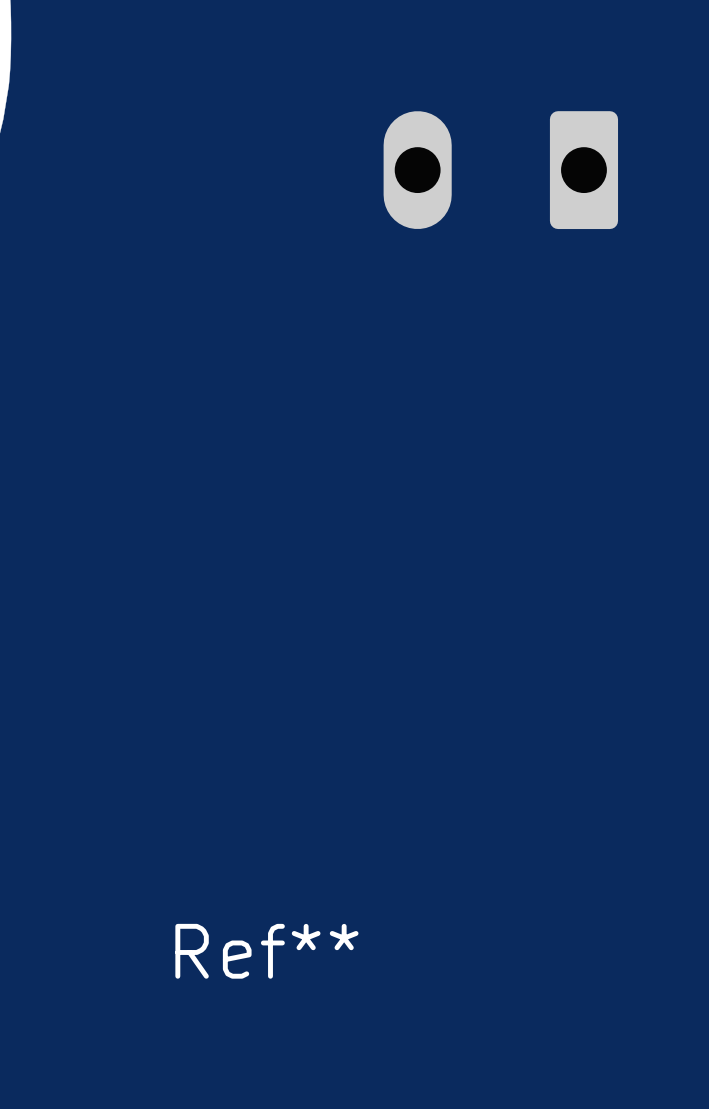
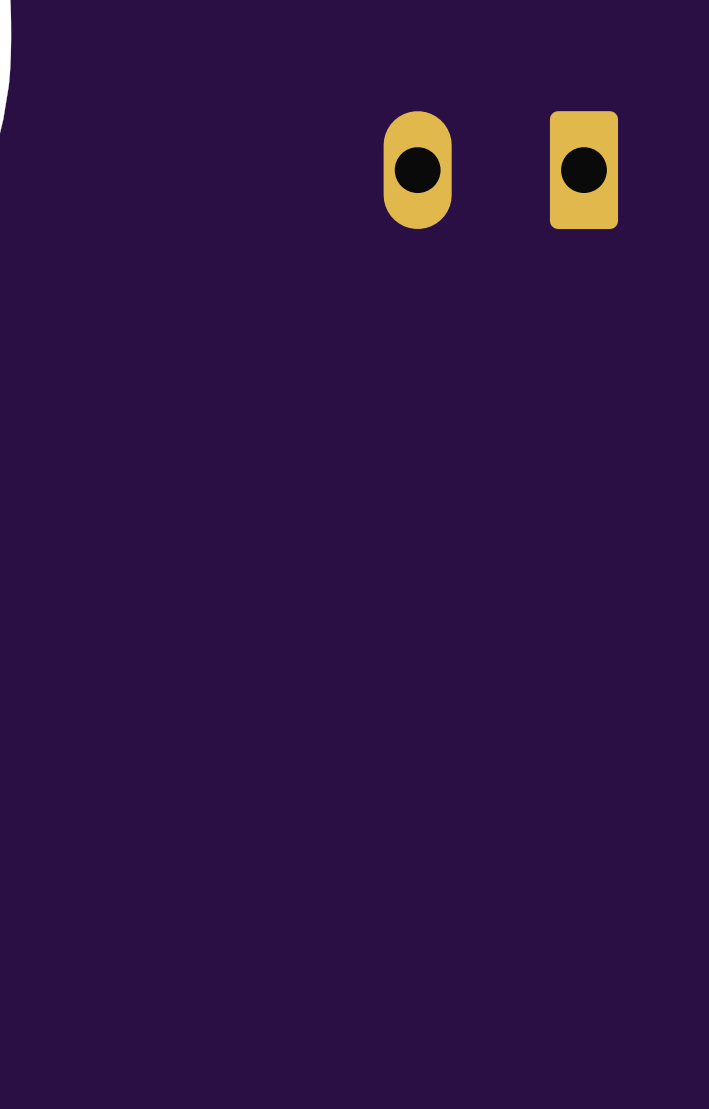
Ref**: (266, 951) -> none

